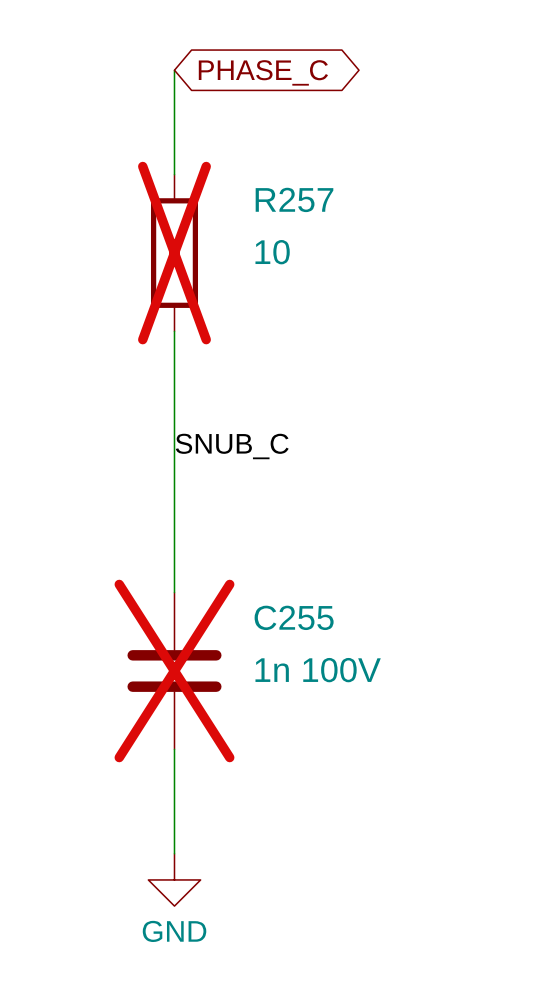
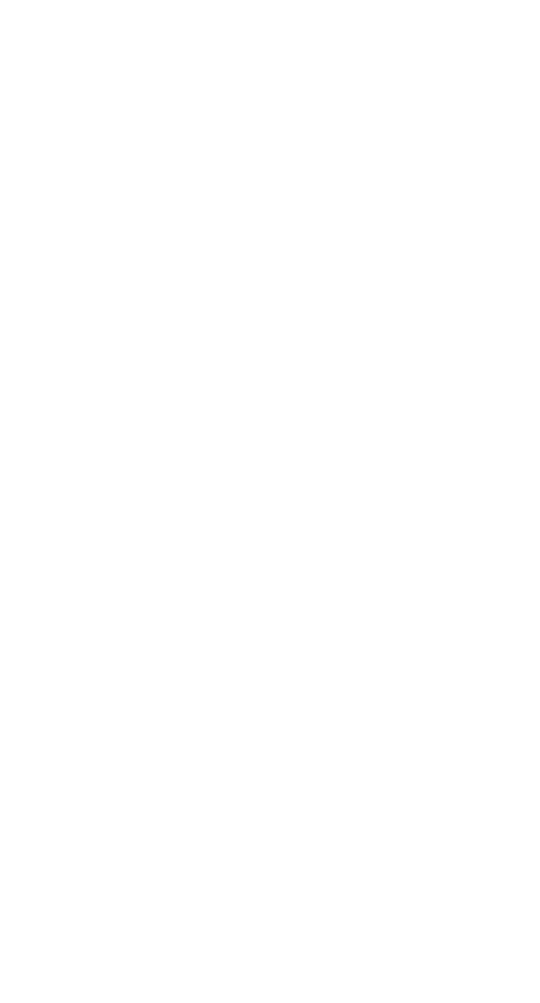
wire: (174, 70) (174, 174) -> none
global label: PHASE_C (263, 72) -> none
R257: 10 (174, 253) -> none
wire: (174, 331) (174, 592) -> none
label: SNUB_C (232, 446) -> none
C255: 1n 100V (174, 671) -> none
wire: (174, 749) (174, 853) -> none
power symbol: GND (174, 879) -> none

